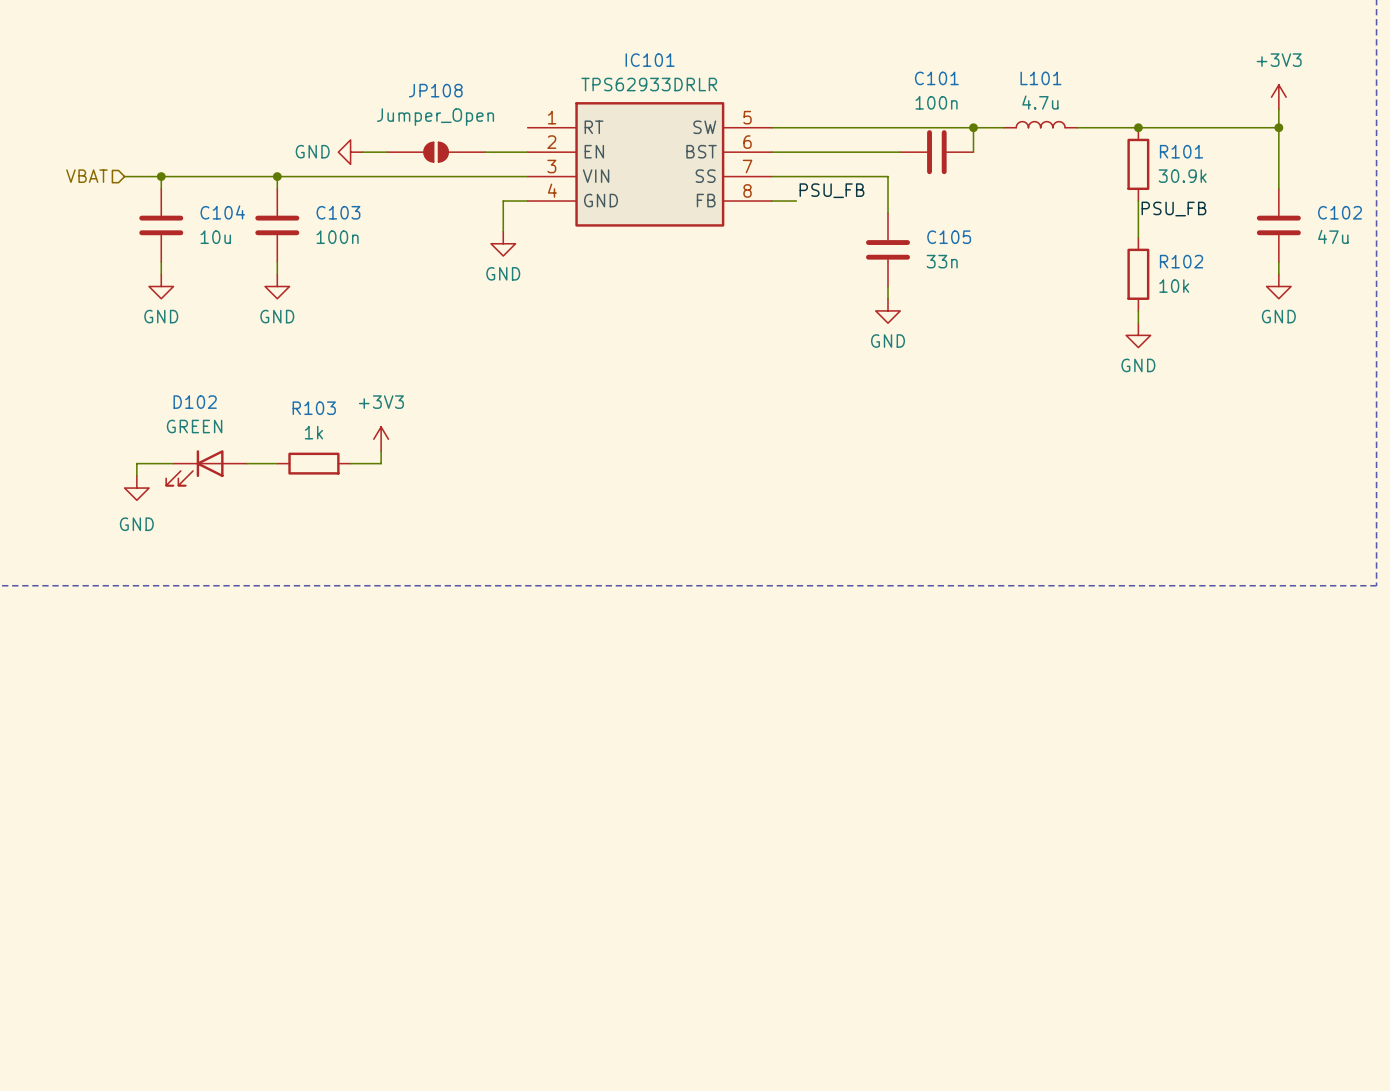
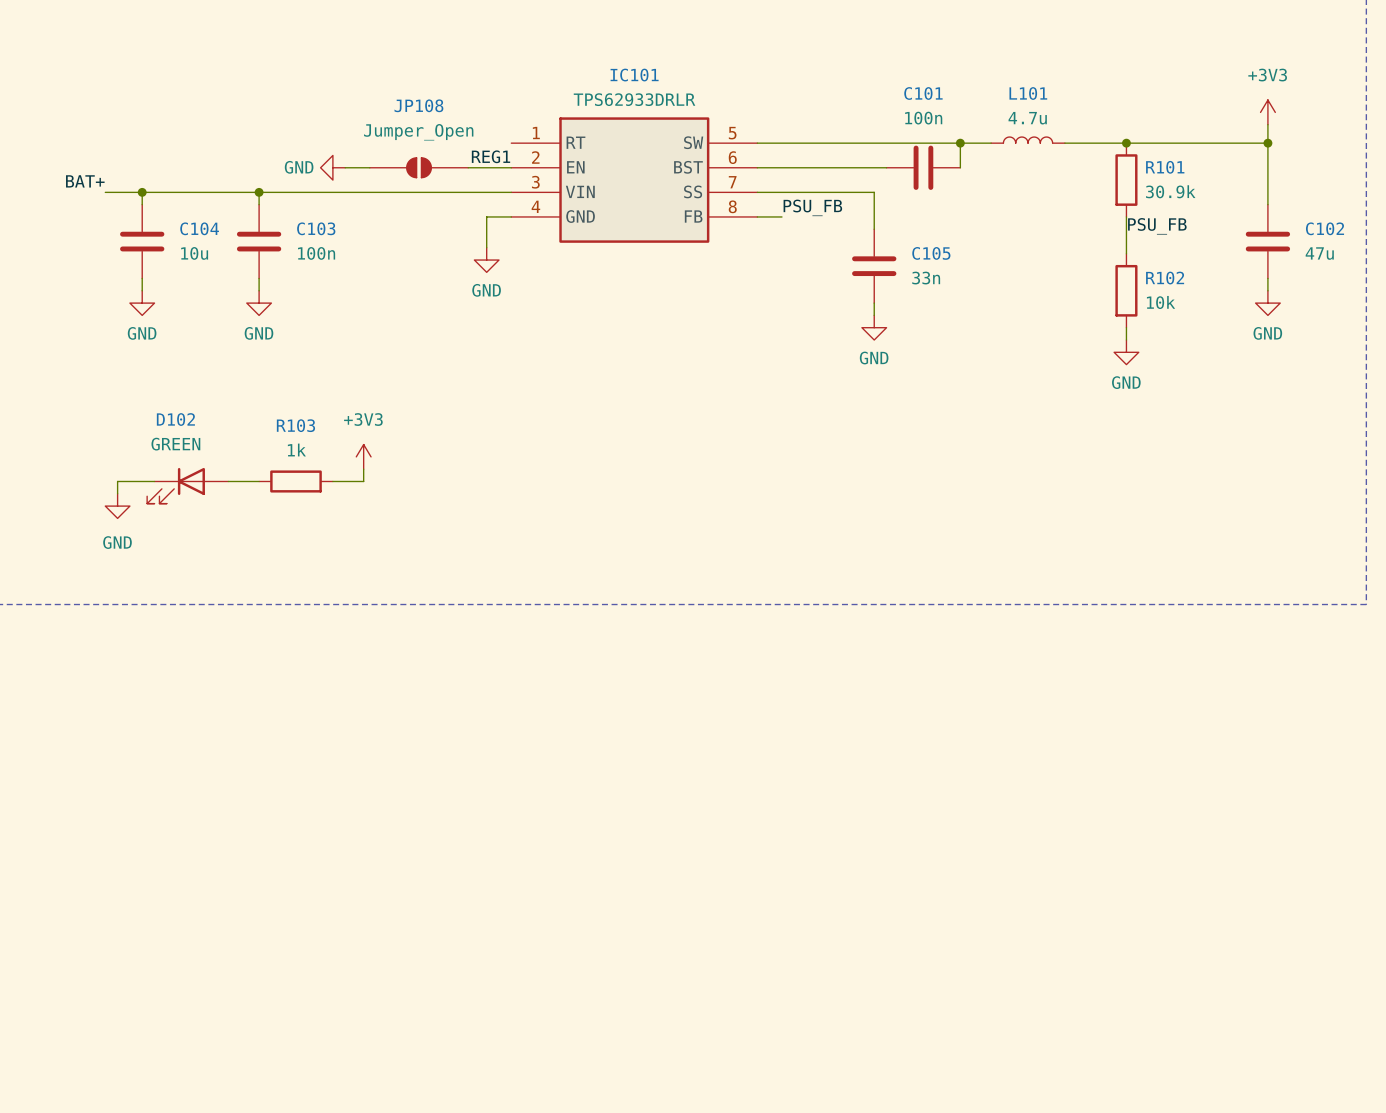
label: none -> REG1 (491, 156)
label: none -> BAT+ (85, 181)
hierarchical label: VBAT (86, 176) -> none

